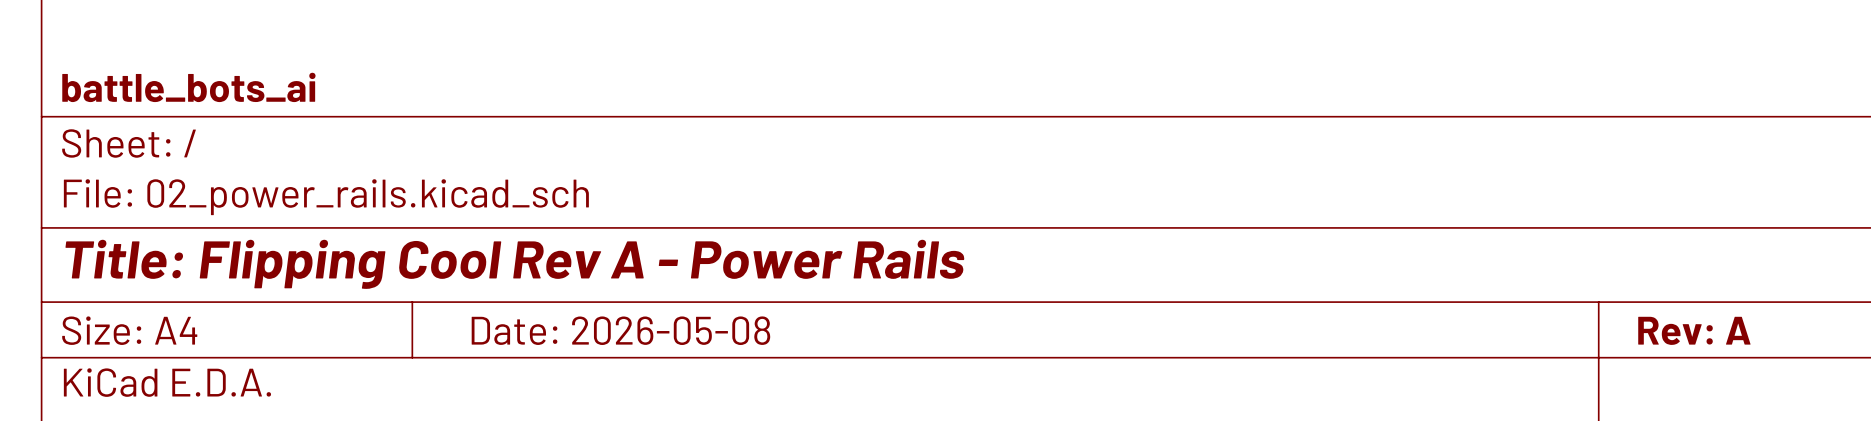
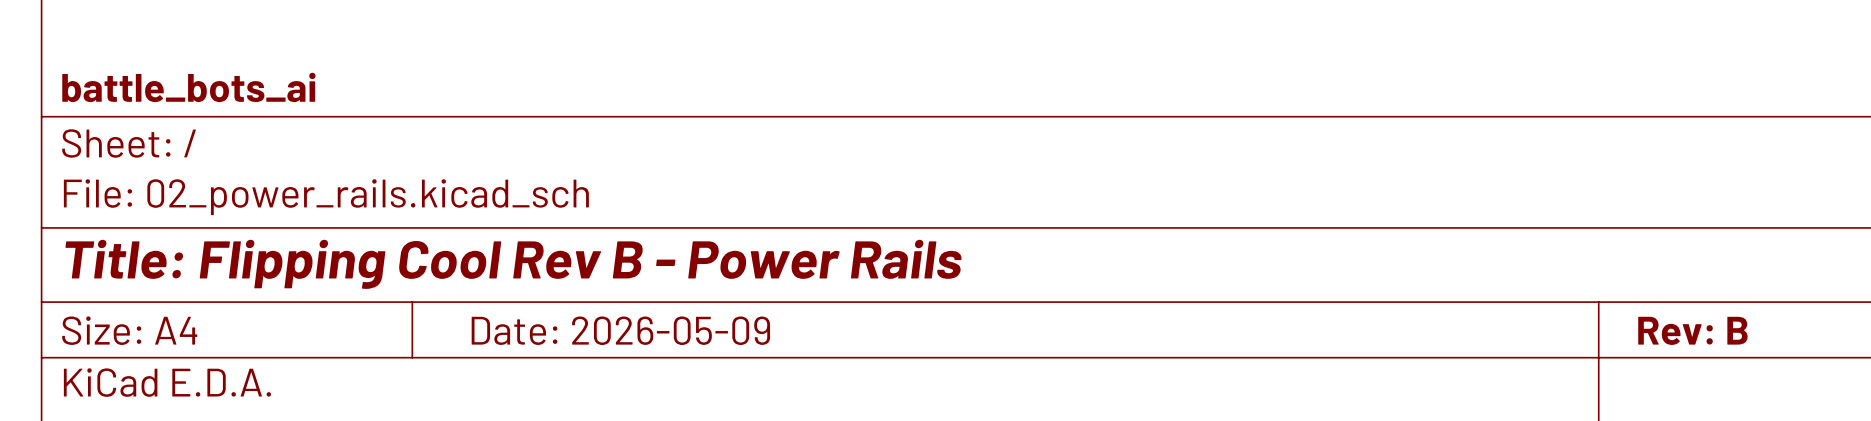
title block: Title: Flipping Cool Rev A - Power Rails (514, 264) -> Title: Flipping Cool Rev B - Power Rails (513, 264)
title block: Date: 2026-05-08 (620, 330) -> Date: 2026-05-09 (620, 330)
title block: Rev: A (1694, 330) -> Rev: B (1692, 330)

